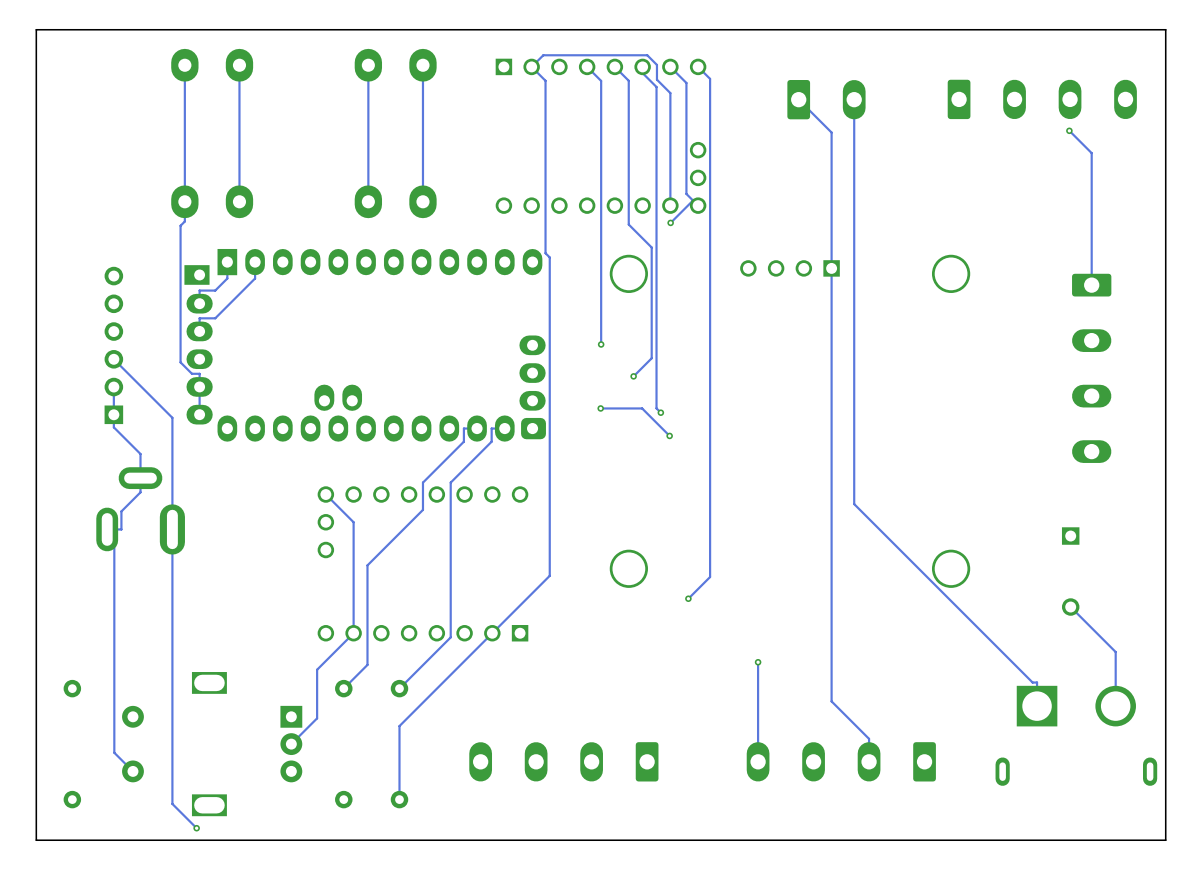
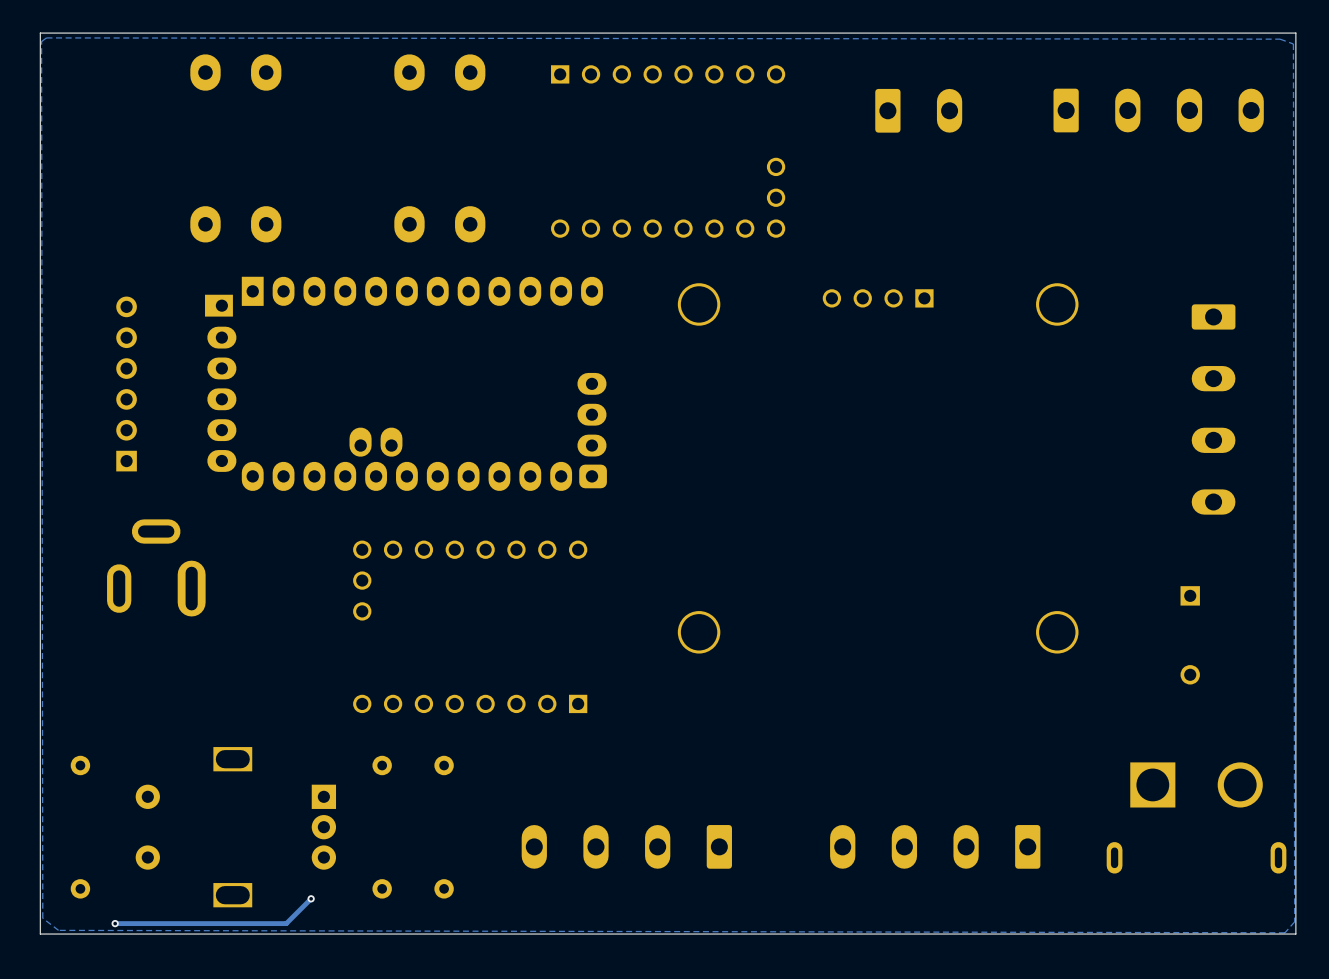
zone outline: none -> (46, 37) (1280, 39) (1293, 44) (1294, 921) (1284, 932) (58, 930) (42, 918) (41, 41) (46, 37)
track: (184, 65) (184, 221) (180, 225) (180, 362) (191, 373) (199, 373) (199, 414) -> none
track: (239, 65) (239, 201) -> none
track: (368, 65) (368, 201) -> none
track: (422, 65) (422, 201) -> none
track: (587, 66) (601, 80) (601, 344) -> none
track: (614, 66) (628, 80) (628, 224) (651, 247) (651, 358) (633, 376) -> none
track: (642, 66) (642, 73) (656, 87) (656, 408) (660, 412) -> none
track: (670, 66) (686, 82) (686, 193) (698, 205) -> none
track: (698, 66) (710, 78) (710, 577) (688, 598) -> none
track: (798, 99) (831, 132) (831, 701) (869, 738) (869, 761) -> none
track: (854, 99) (854, 504) (1032, 682) (1037, 682) (1037, 706) -> none
track: (1069, 130) (1091, 153) (1091, 285) -> none
via: (1069, 130) -> none
track: (693, 200) (670, 222) -> none
track: (670, 205) (670, 93) (656, 79) (656, 64) (647, 55) (543, 55) (531, 66) (545, 80) (545, 253) (549, 257) (549, 575) (399, 726) (399, 799) -> none
via: (670, 222) -> none
track: (227, 262) (227, 278) (215, 290) (199, 290) (199, 303) -> none
track: (255, 262) (255, 278) (215, 318) (199, 318) (199, 331) -> none
via: (601, 344) -> none
track: (113, 359) (172, 417) (172, 803) (196, 828) -> none
via: (633, 376) -> none
track: (113, 387) (113, 427) (140, 454) (140, 492) (121, 511) (121, 529) (107, 529) -> none
track: (600, 408) (642, 408) (669, 435) -> none
via: (600, 408) -> none
via: (660, 412) -> none
track: (477, 428) (463, 428) (463, 441) (422, 482) (422, 509) (367, 565) (367, 664) (343, 688) -> none
track: (504, 428) (491, 428) (491, 441) (450, 482) (450, 637) (399, 688) -> none
via: (669, 435) -> none
track: (325, 494) (353, 522) (353, 633) (317, 669) (317, 718) (291, 744) -> none
track: (114, 529) (114, 752) (132, 771) -> none
via: (688, 598) -> none
track: (1070, 607) (1115, 652) (1115, 706) -> none
track: (758, 662) (758, 761) -> none
via: (758, 662) -> none
track: none -> (311, 898) (286, 923) (115, 923)
via: none -> (311, 898)
via: (196, 828) -> none
via: none -> (115, 923)

